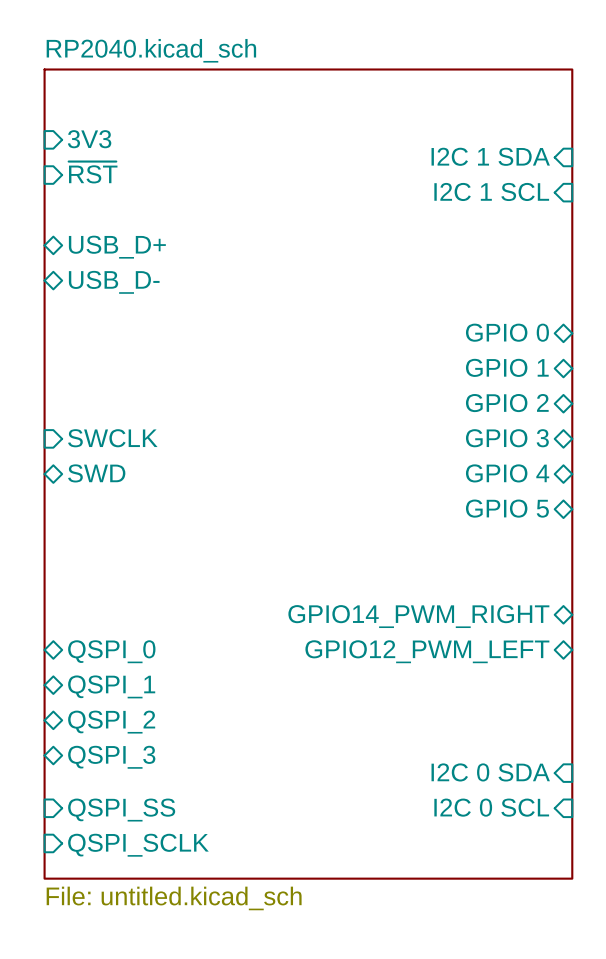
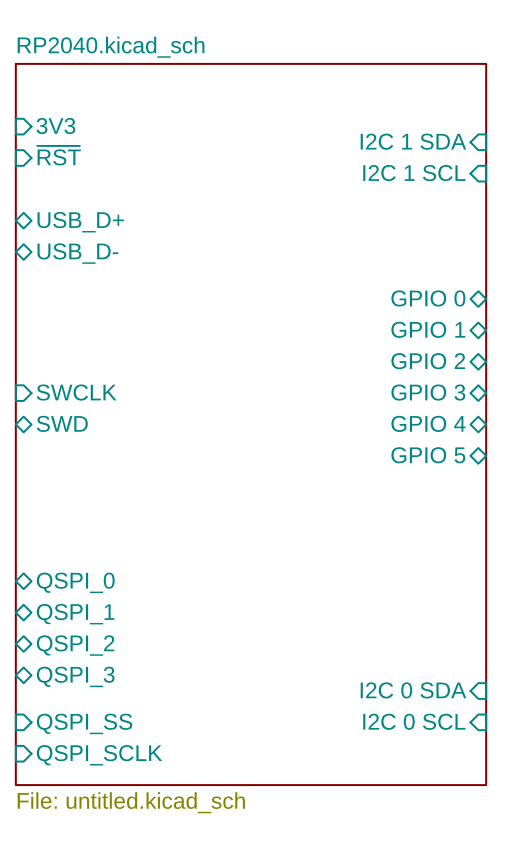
sheet pin: GPIO14_PWM_RIGHT (418, 616) -> none
sheet pin: GPIO12_PWM_LEFT (427, 651) -> none

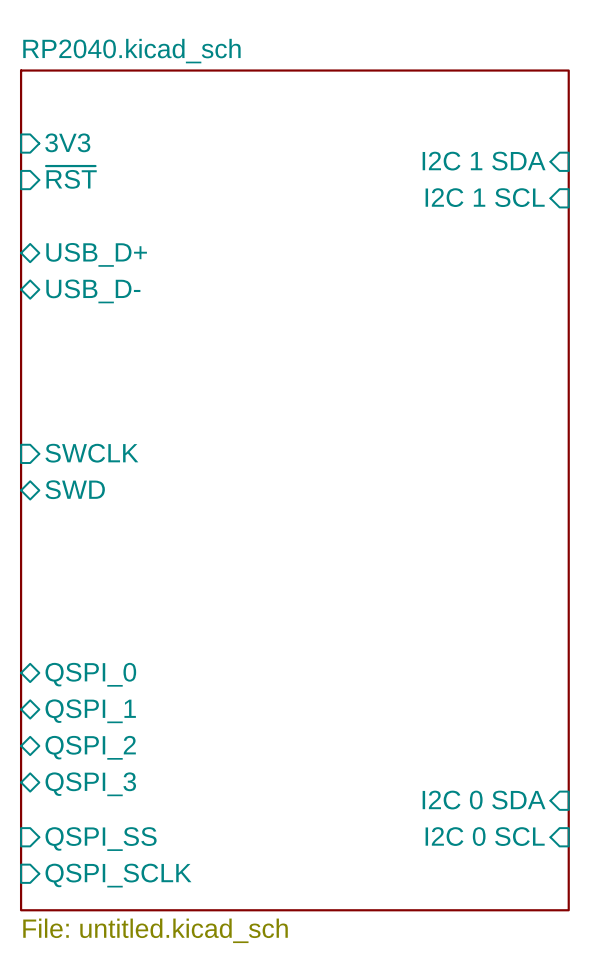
sheet pin: GPIO 0 (428, 298) -> none
sheet pin: GPIO 1 (428, 329) -> none
sheet pin: GPIO 2 (428, 361) -> none
sheet pin: GPIO 3 (428, 392) -> none
sheet pin: GPIO 4 (428, 423) -> none
sheet pin: GPIO 5 (428, 455) -> none

